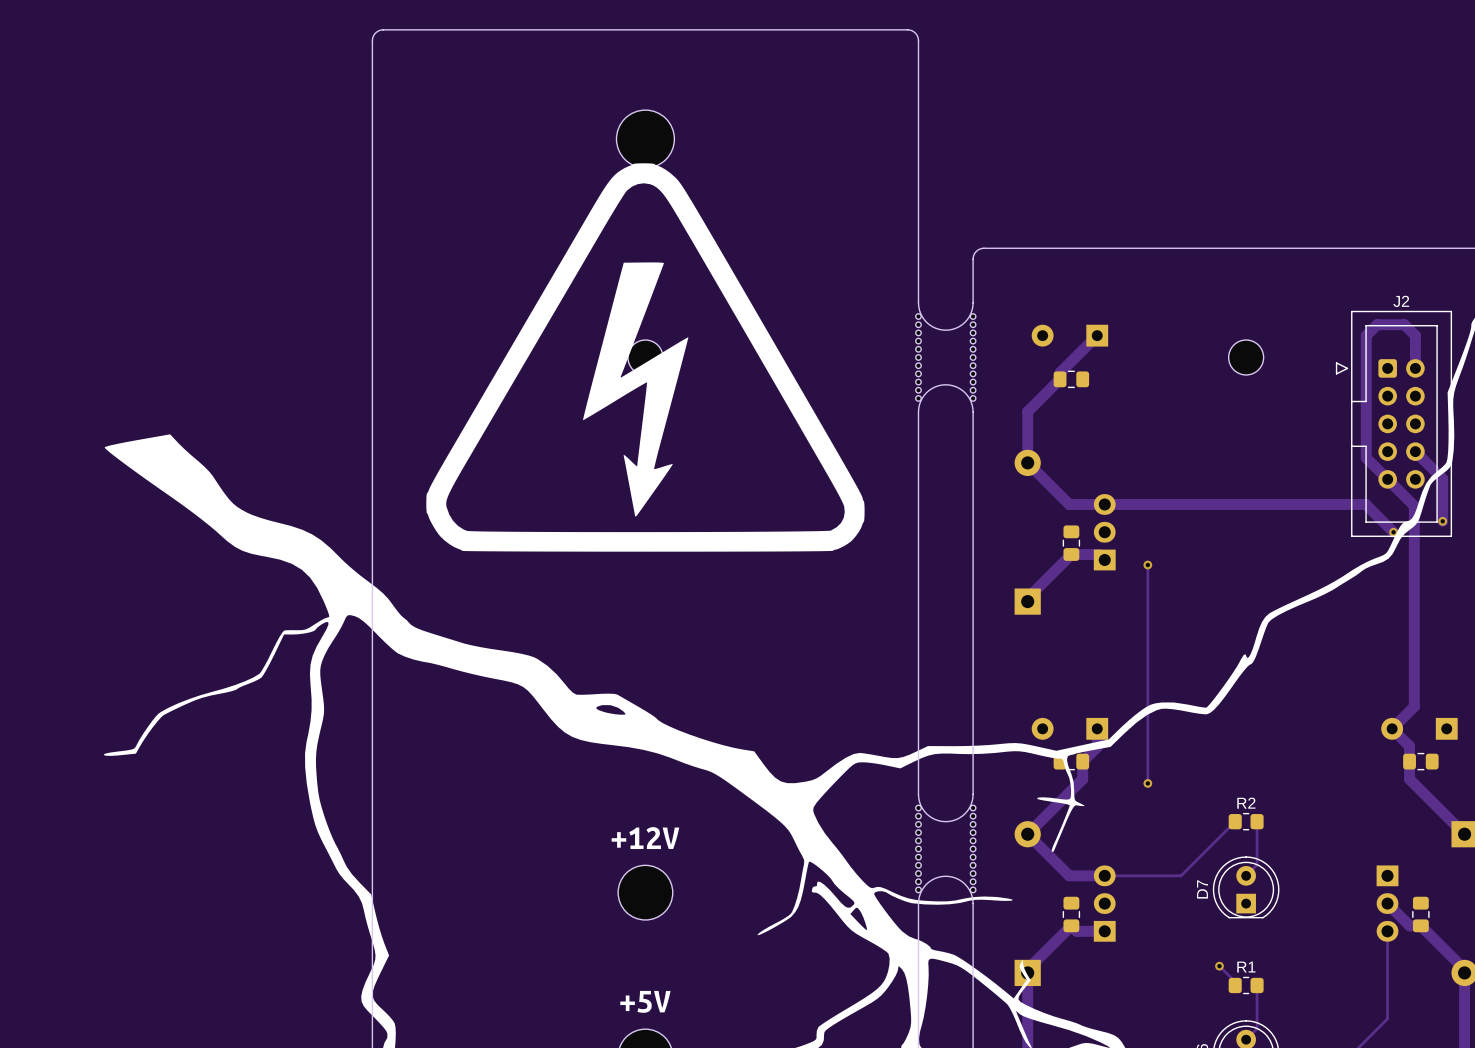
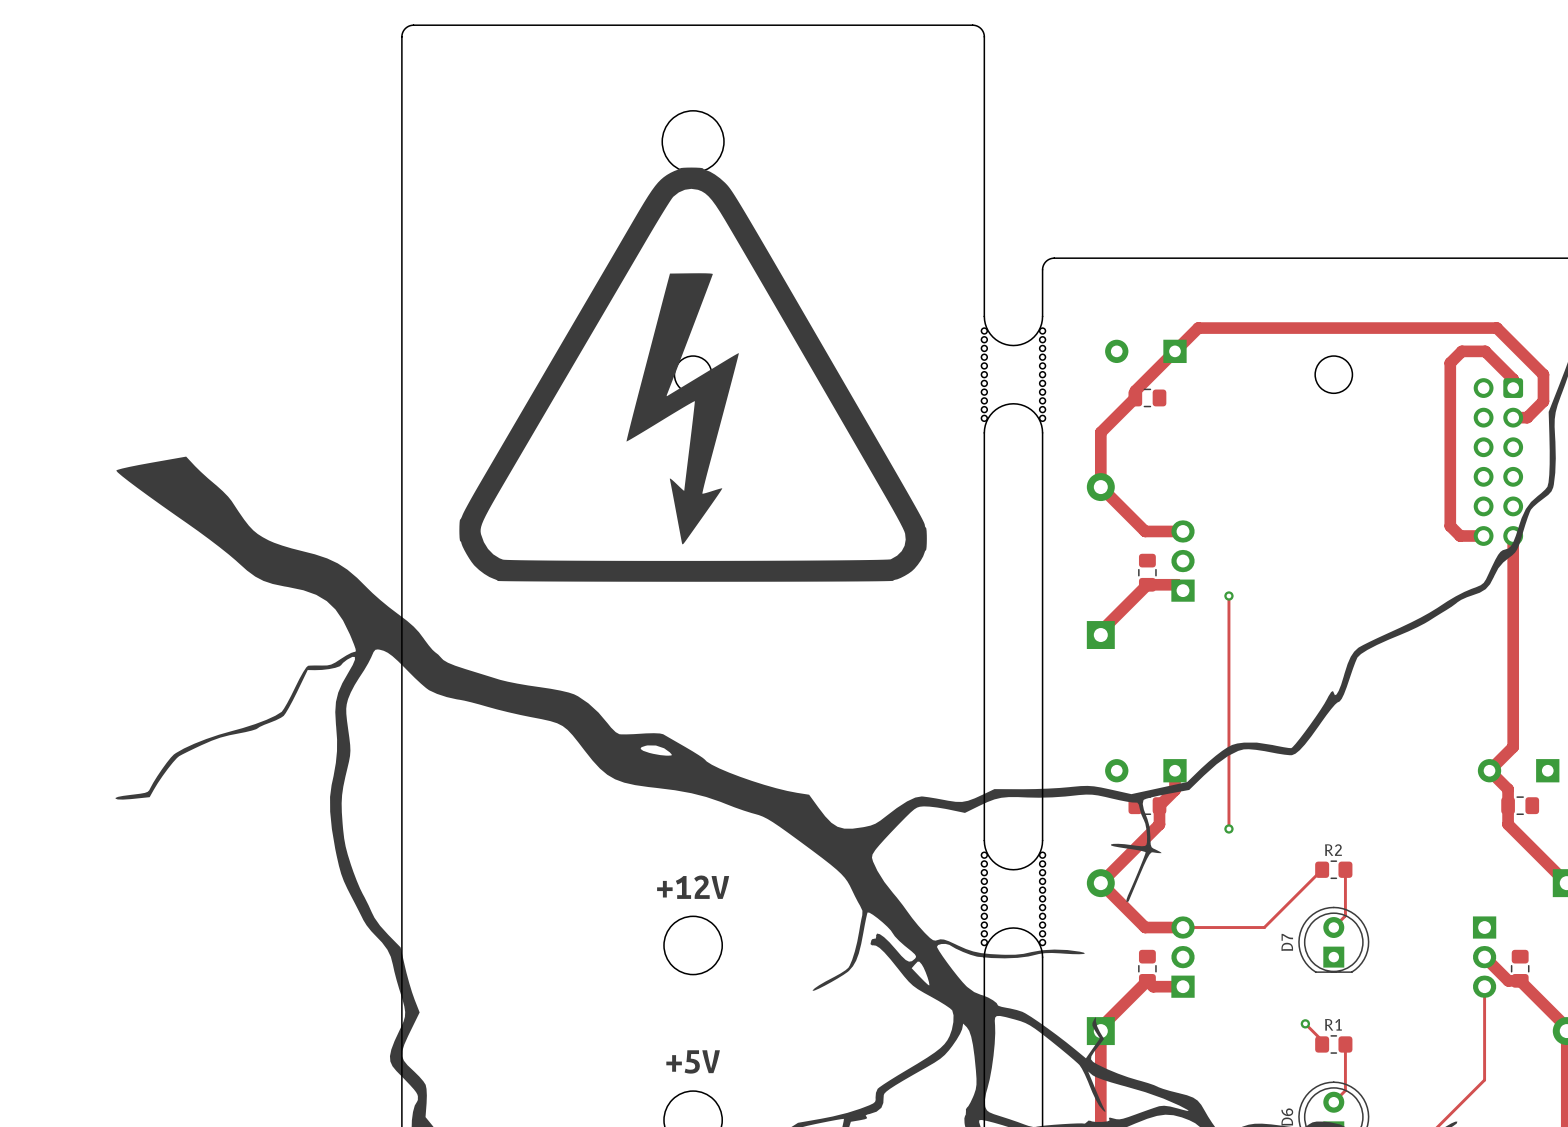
track: none -> (1174, 351) (1198, 328) (1496, 328) (1543, 374) (1543, 401) (1527, 417) (1513, 417)
track: (1415, 368) (1415, 335) (1404, 324) (1377, 324) (1366, 335) (1366, 457) (1414, 506) (1414, 508) -> none
track: none -> (1513, 388) (1513, 379) (1485, 351) (1461, 351) (1450, 363) (1450, 526) (1460, 536) (1483, 536)
J2: (1393, 423) -> none
part: none -> (1498, 462)
track: (1415, 451) (1442, 478) (1442, 521) -> none
track: (1104, 504) (1365, 504) (1393, 532) -> none
via: (1442, 521) -> none
via: (1393, 532) -> none

